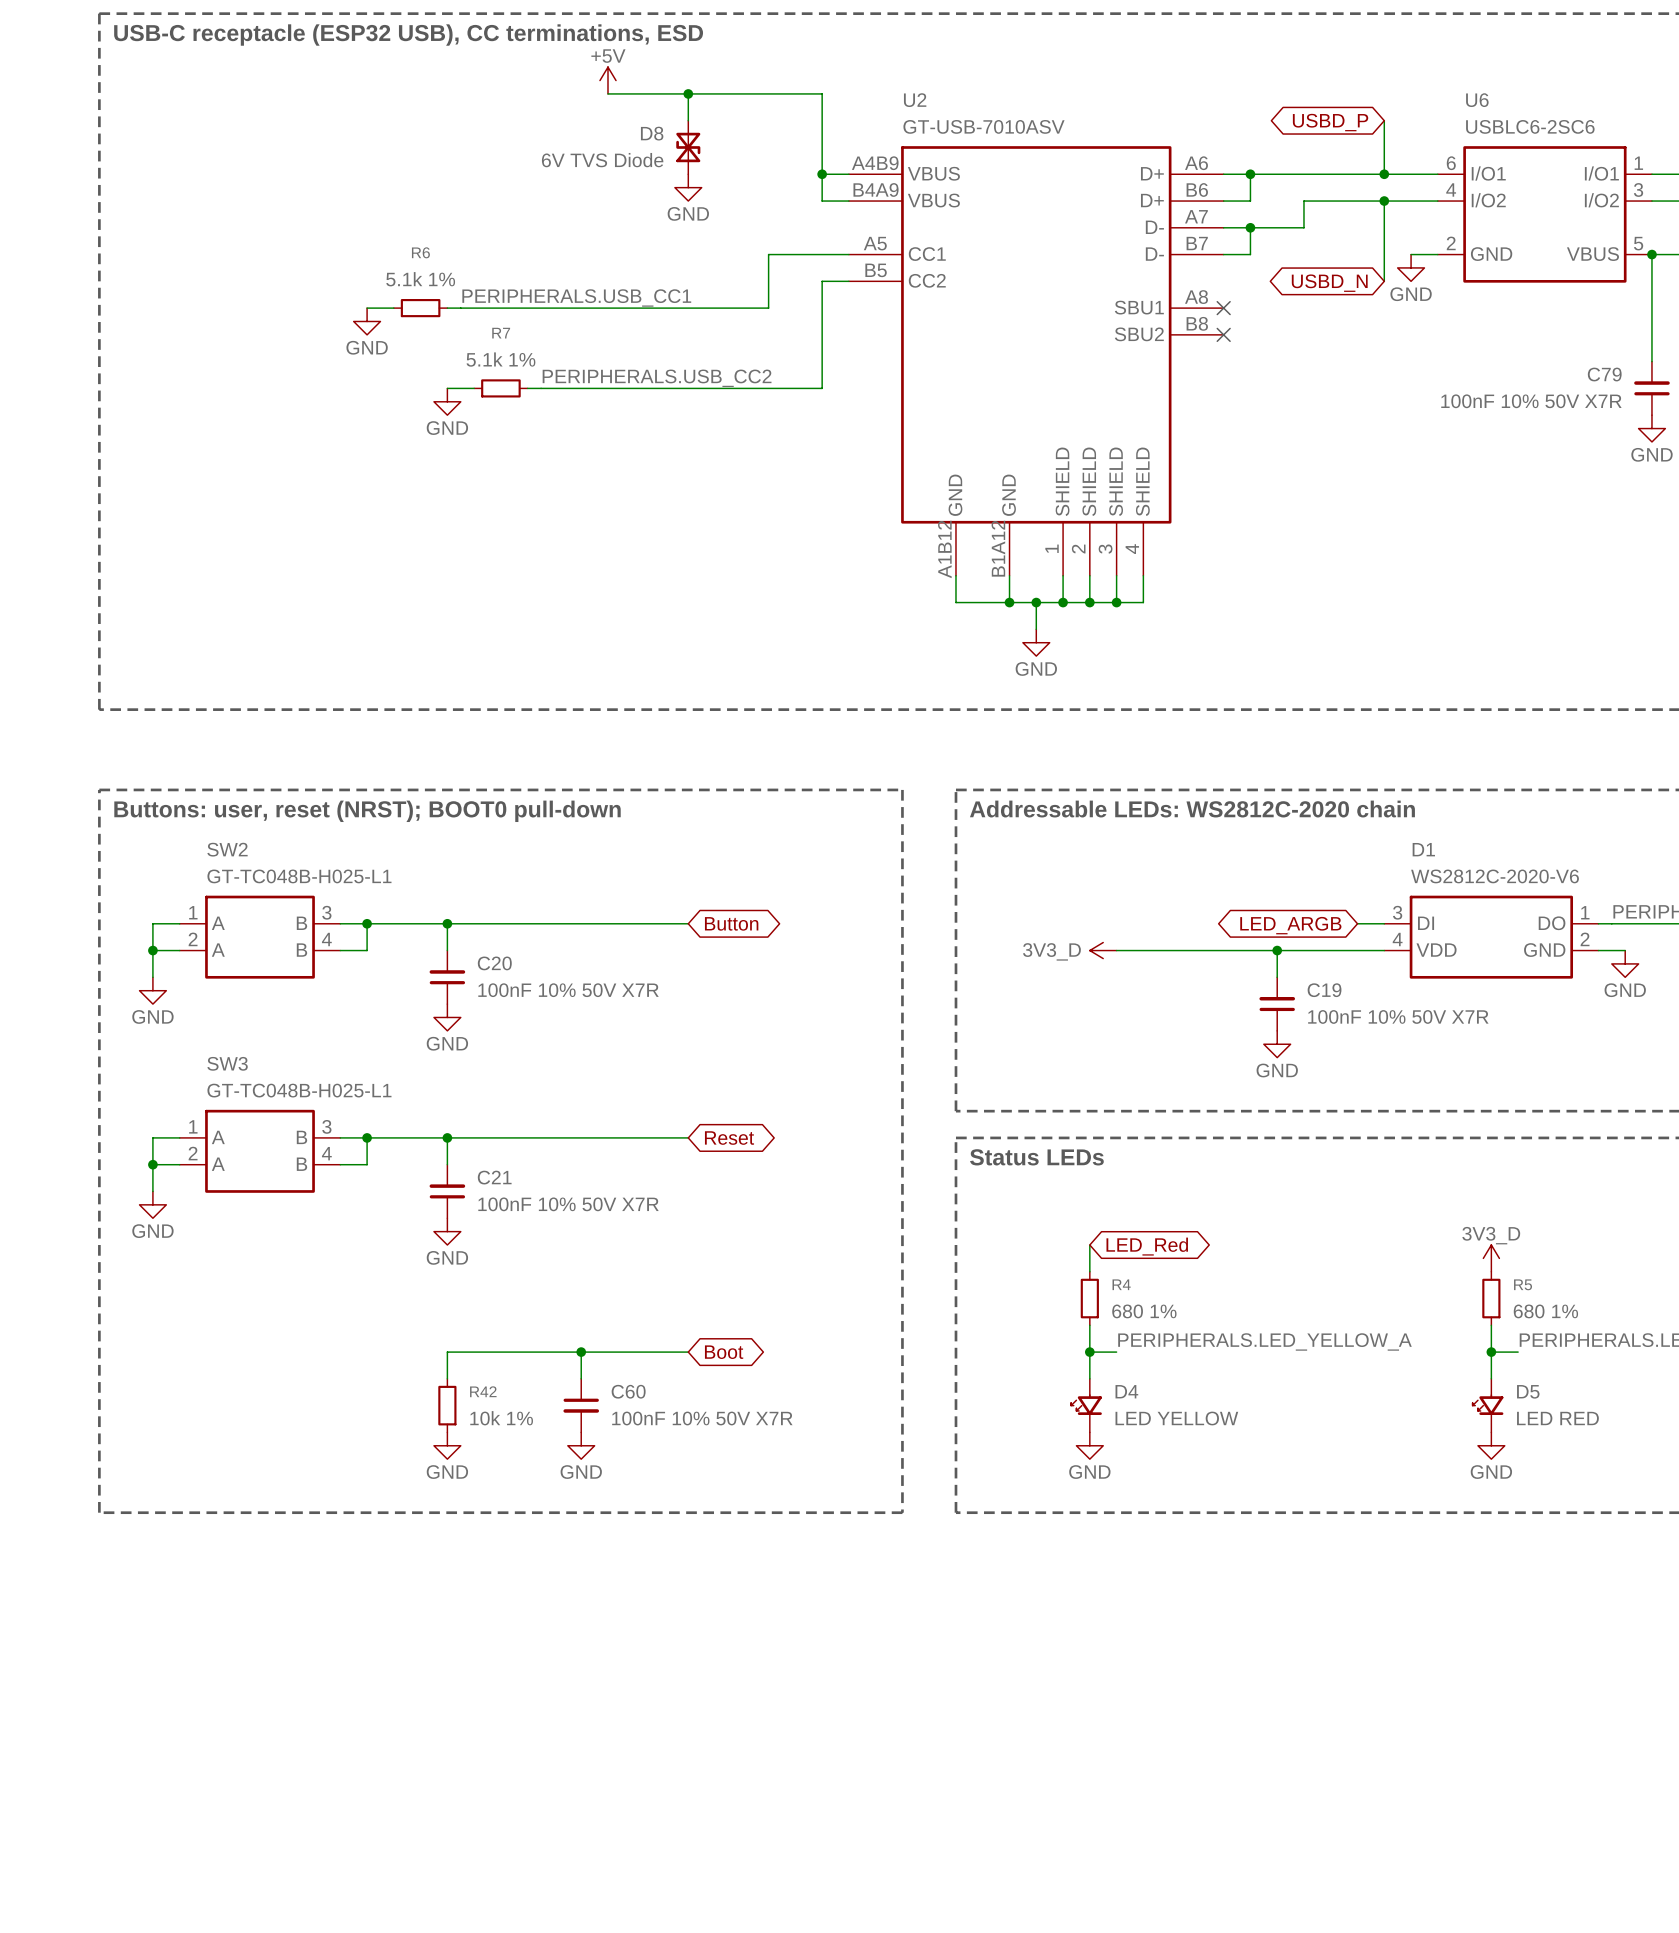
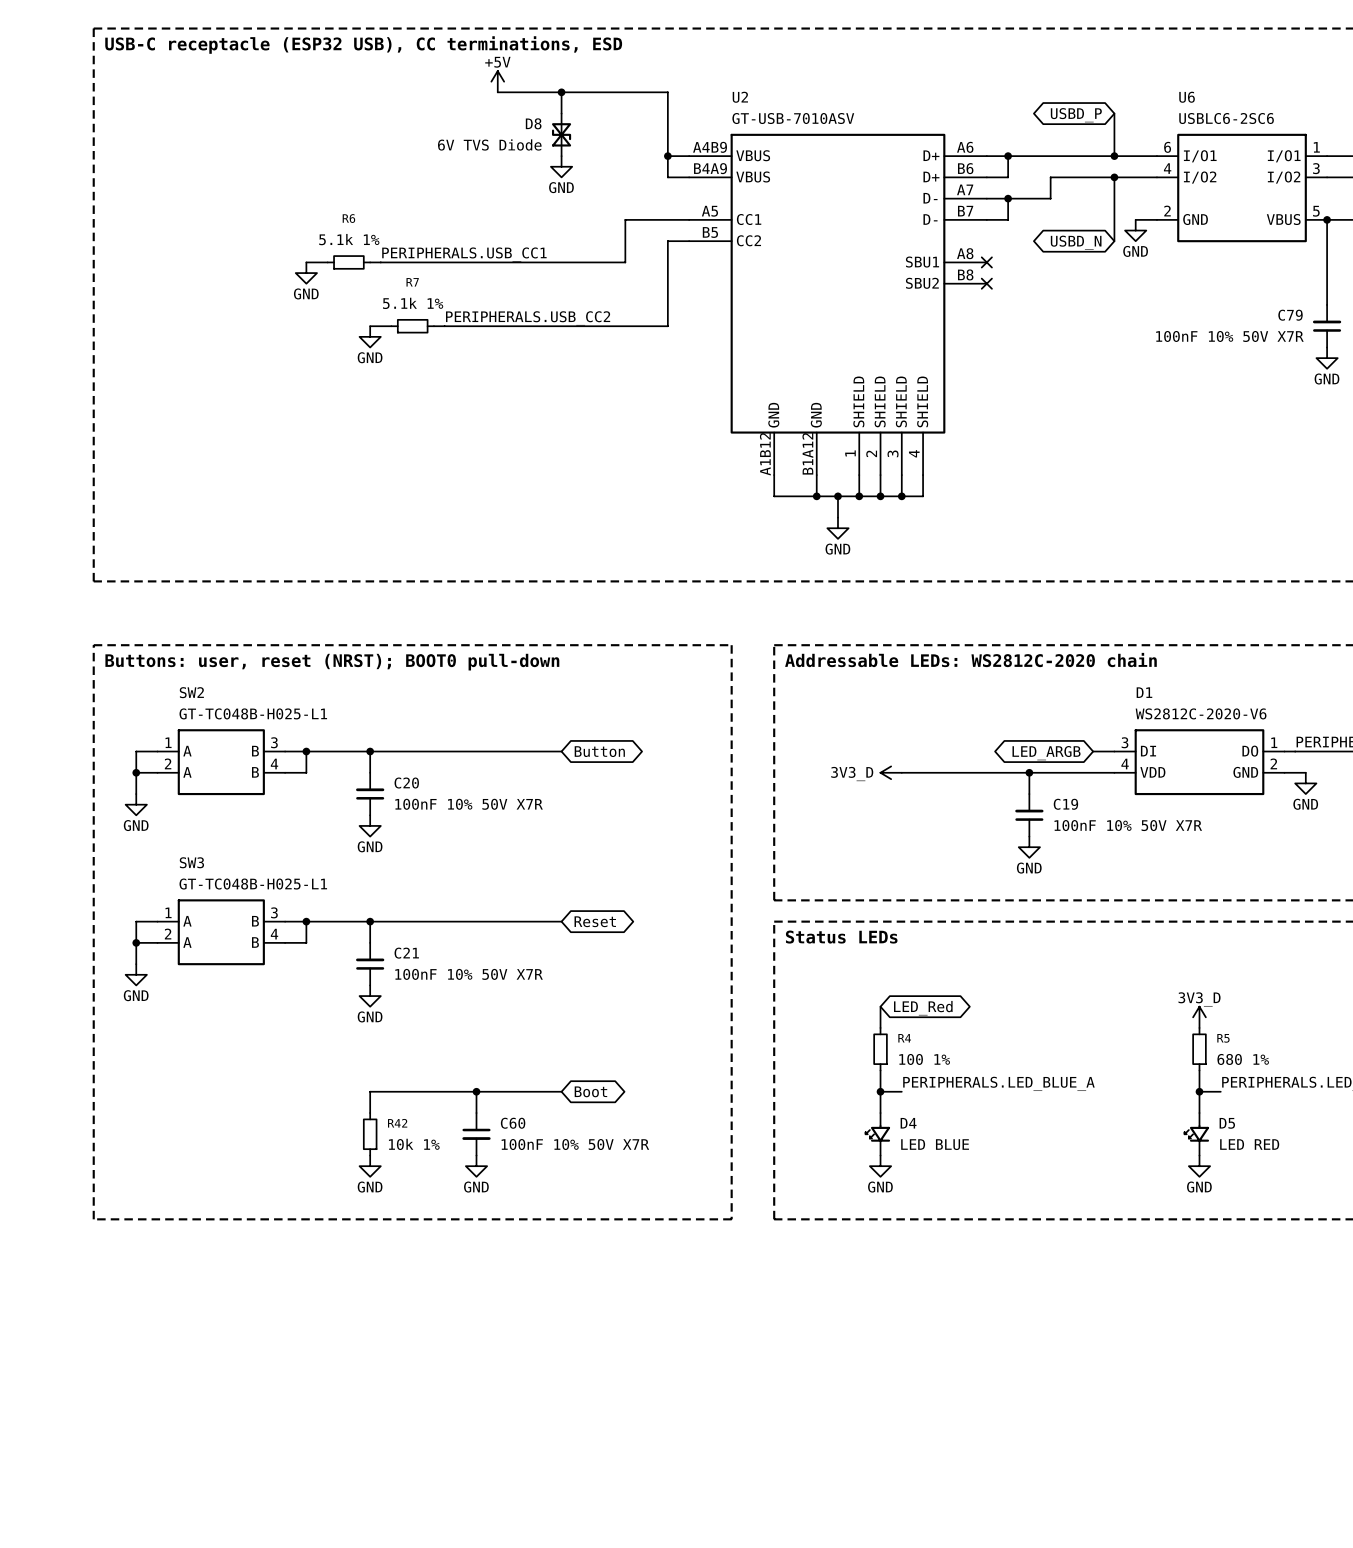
R4 value: 680 1% (1144, 1311) -> 100 1% (924, 1059)
label: PERIPHERALS.LED_YELLOW_A (1264, 1341) -> PERIPHERALS.LED_BLUE_A (998, 1083)
D4 value: LED YELLOW (1176, 1418) -> LED BLUE (935, 1144)

